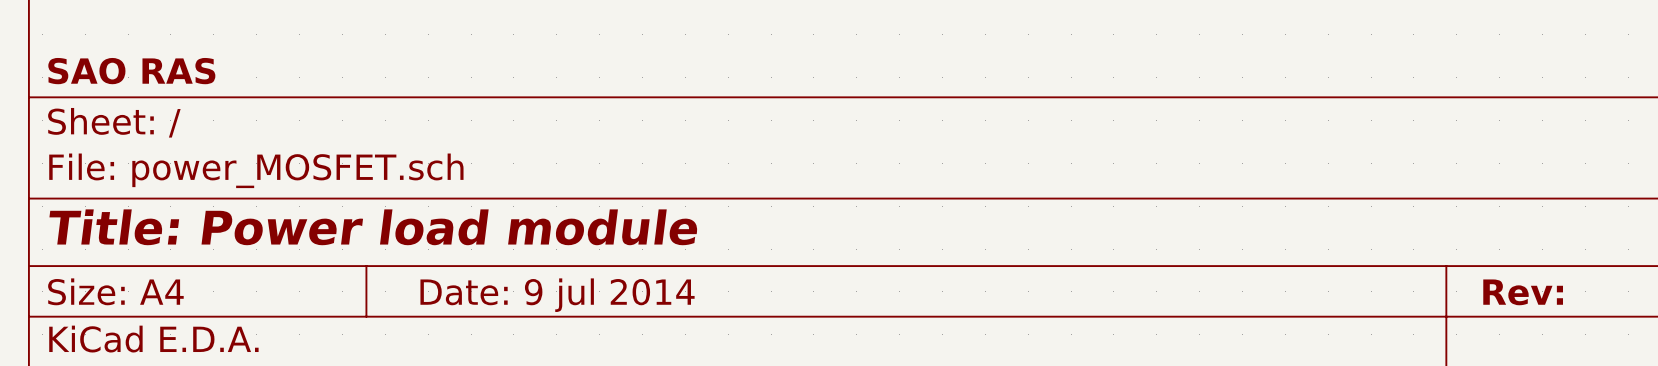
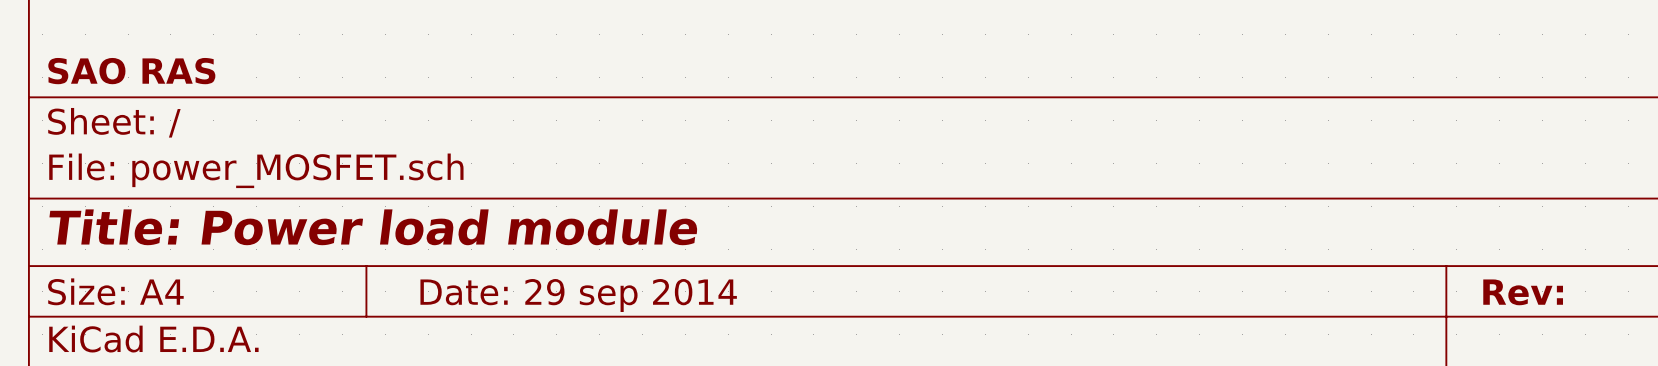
title block: Date: 9 jul 2014 (557, 295) -> Date: 29 sep 2014 (578, 295)

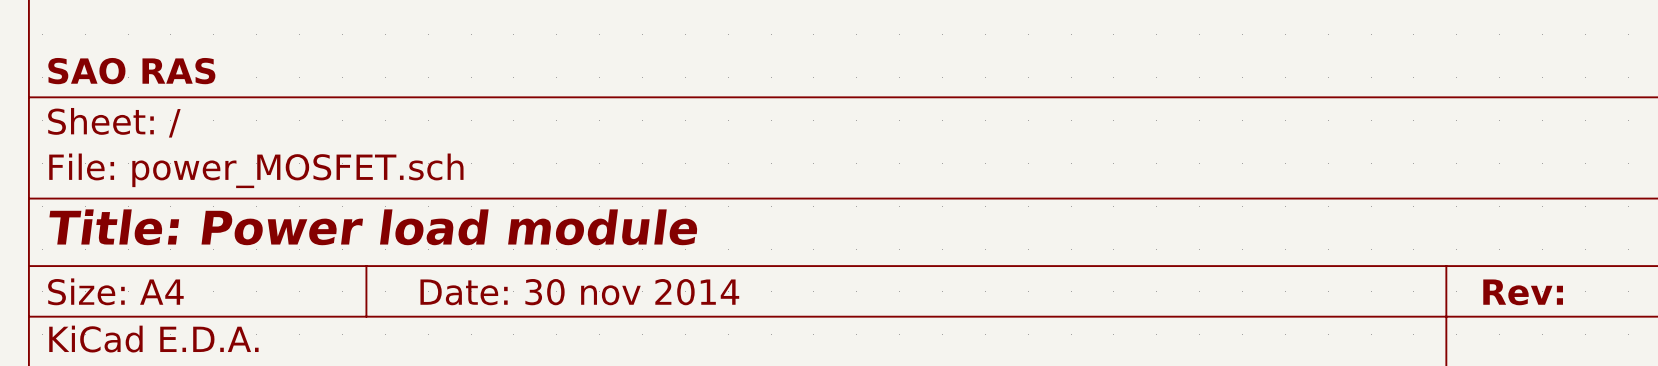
title block: Date: 29 sep 2014 (578, 295) -> Date: 30 nov 2014 (579, 292)

